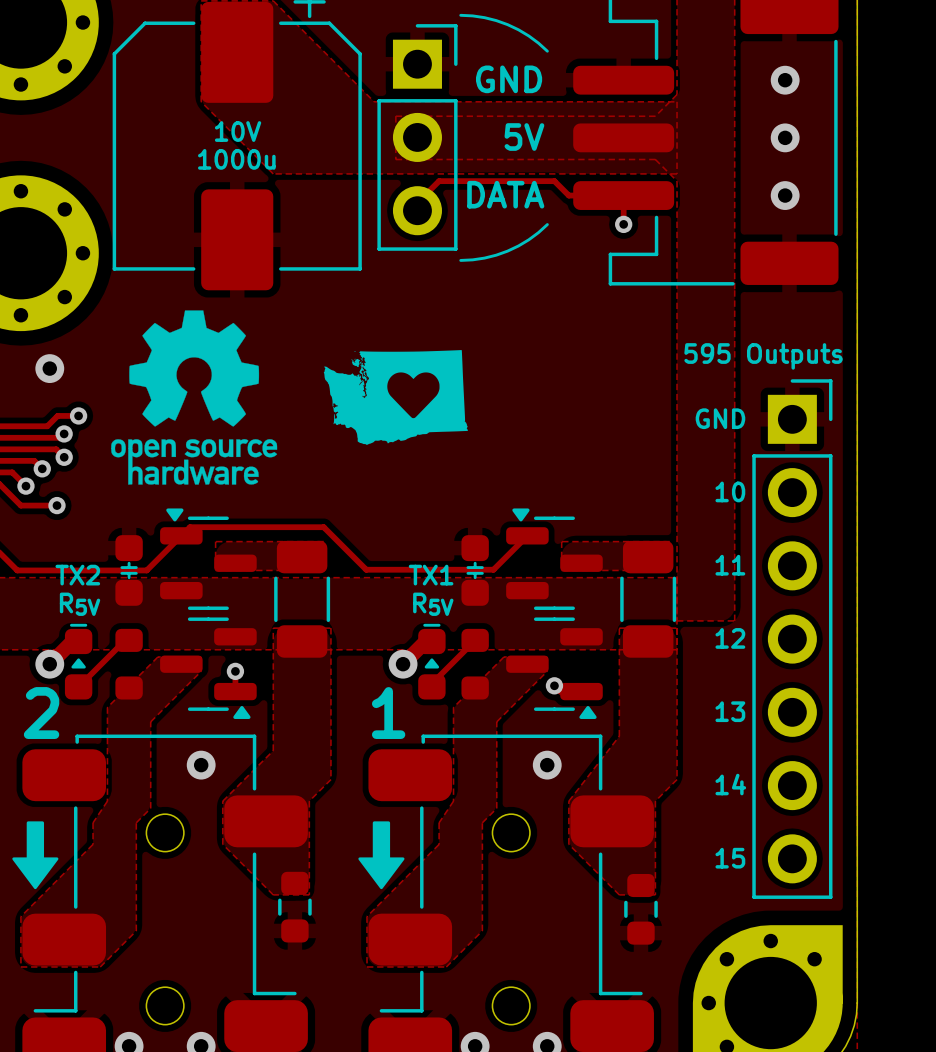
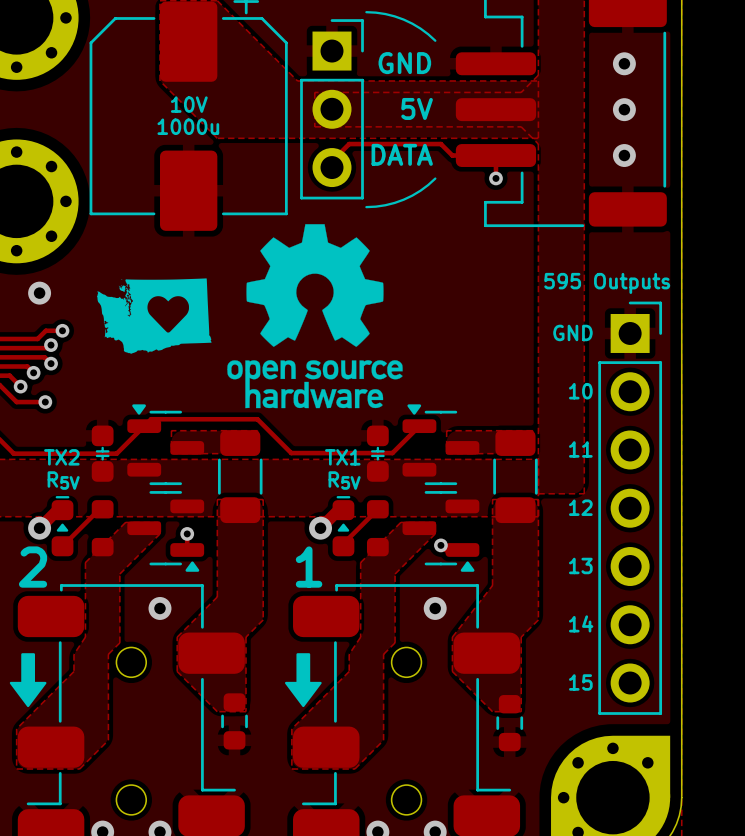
drawing: none -> [227, 224, 403, 409]
drawing: [111, 310, 278, 485] -> none
drawing position: (395, 397) -> (154, 316)

